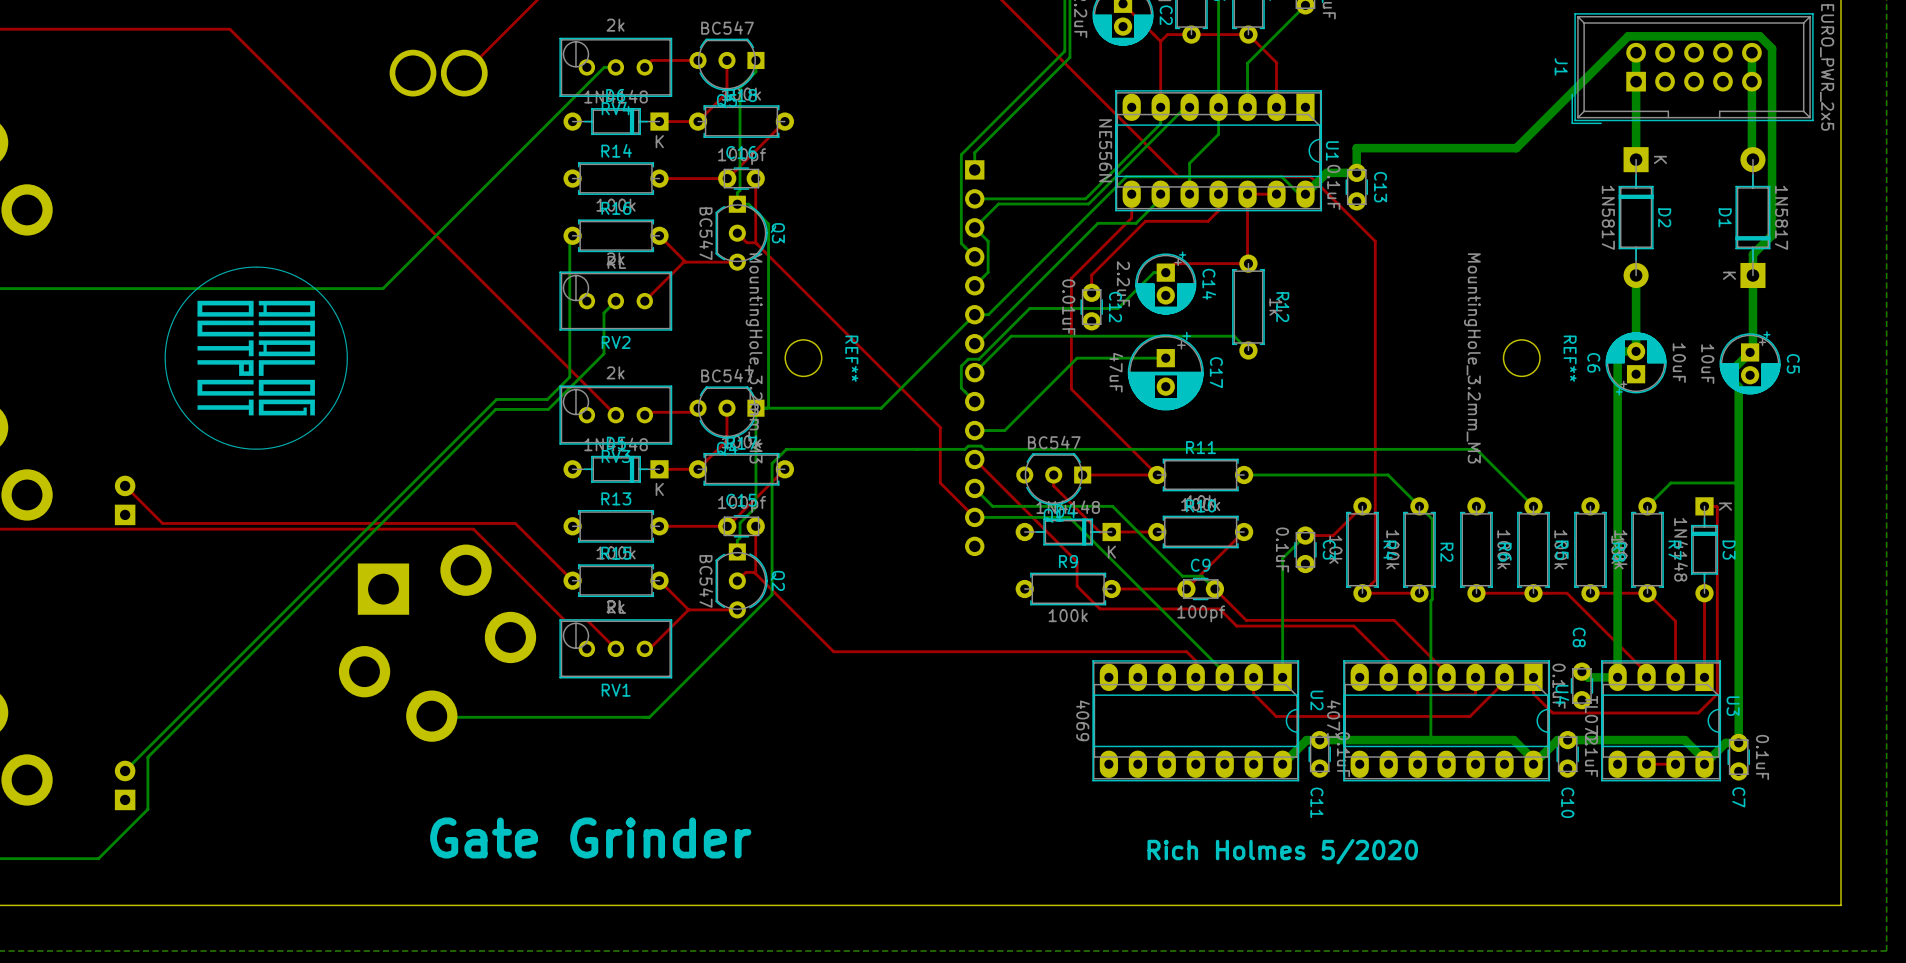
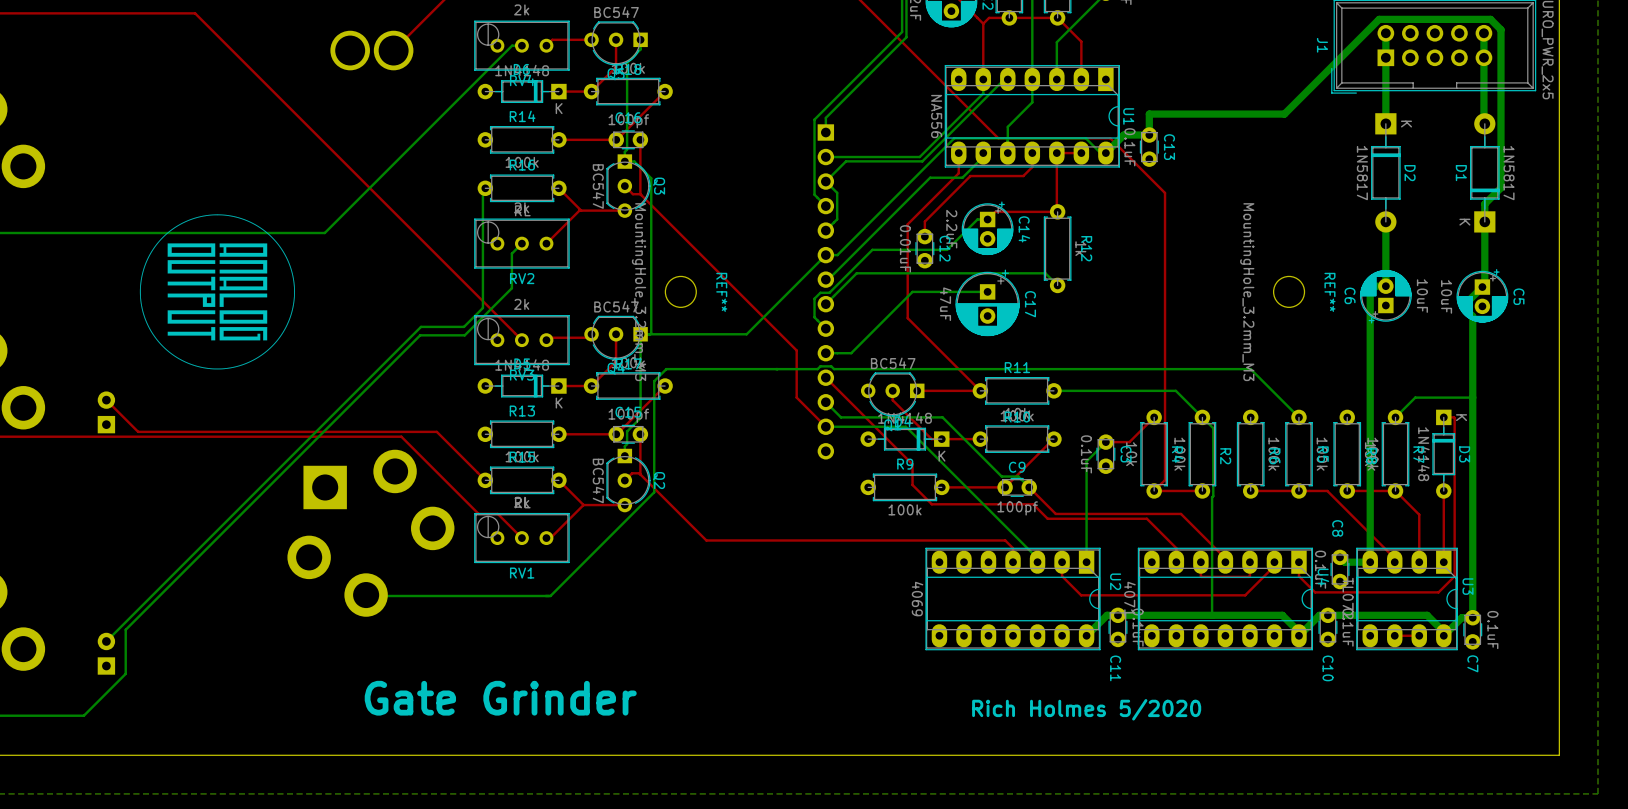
U1 value: NE556N (1105, 150) -> NA556 (936, 116)

